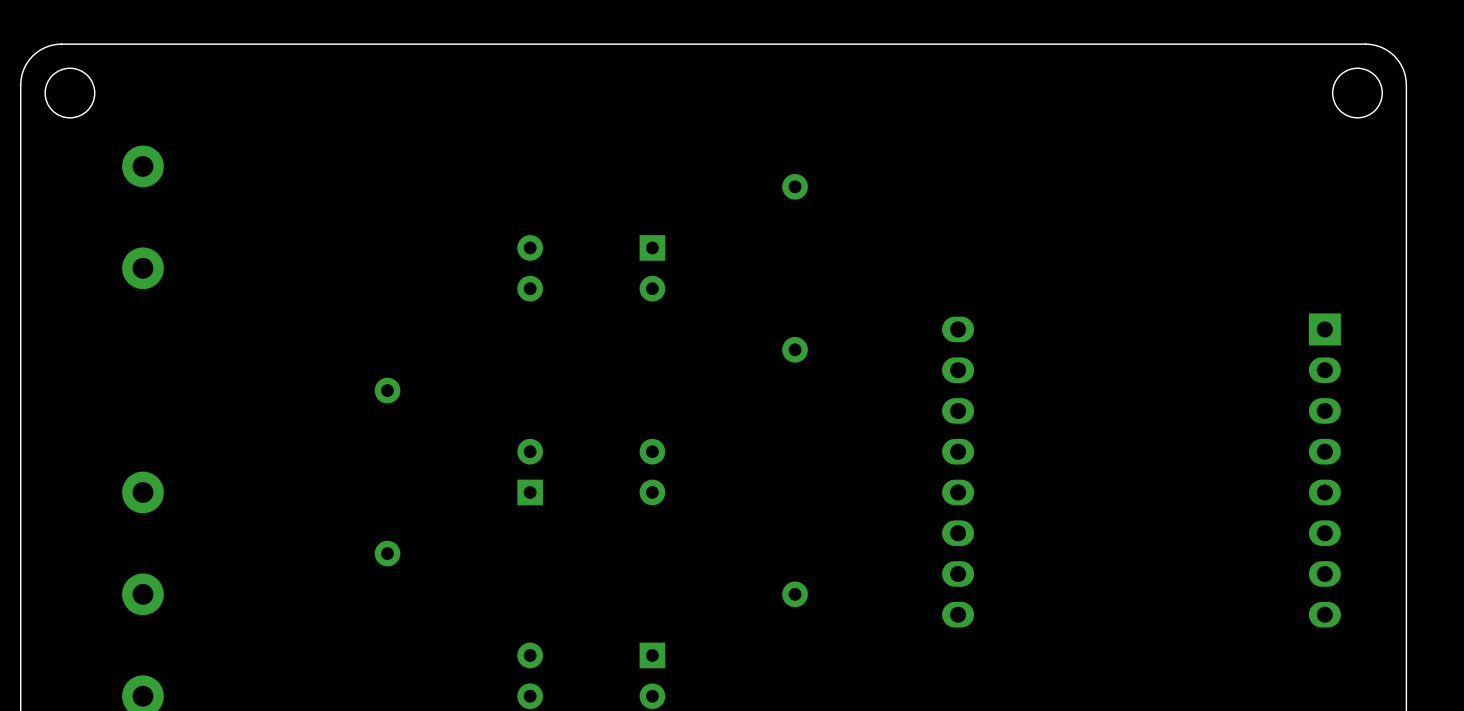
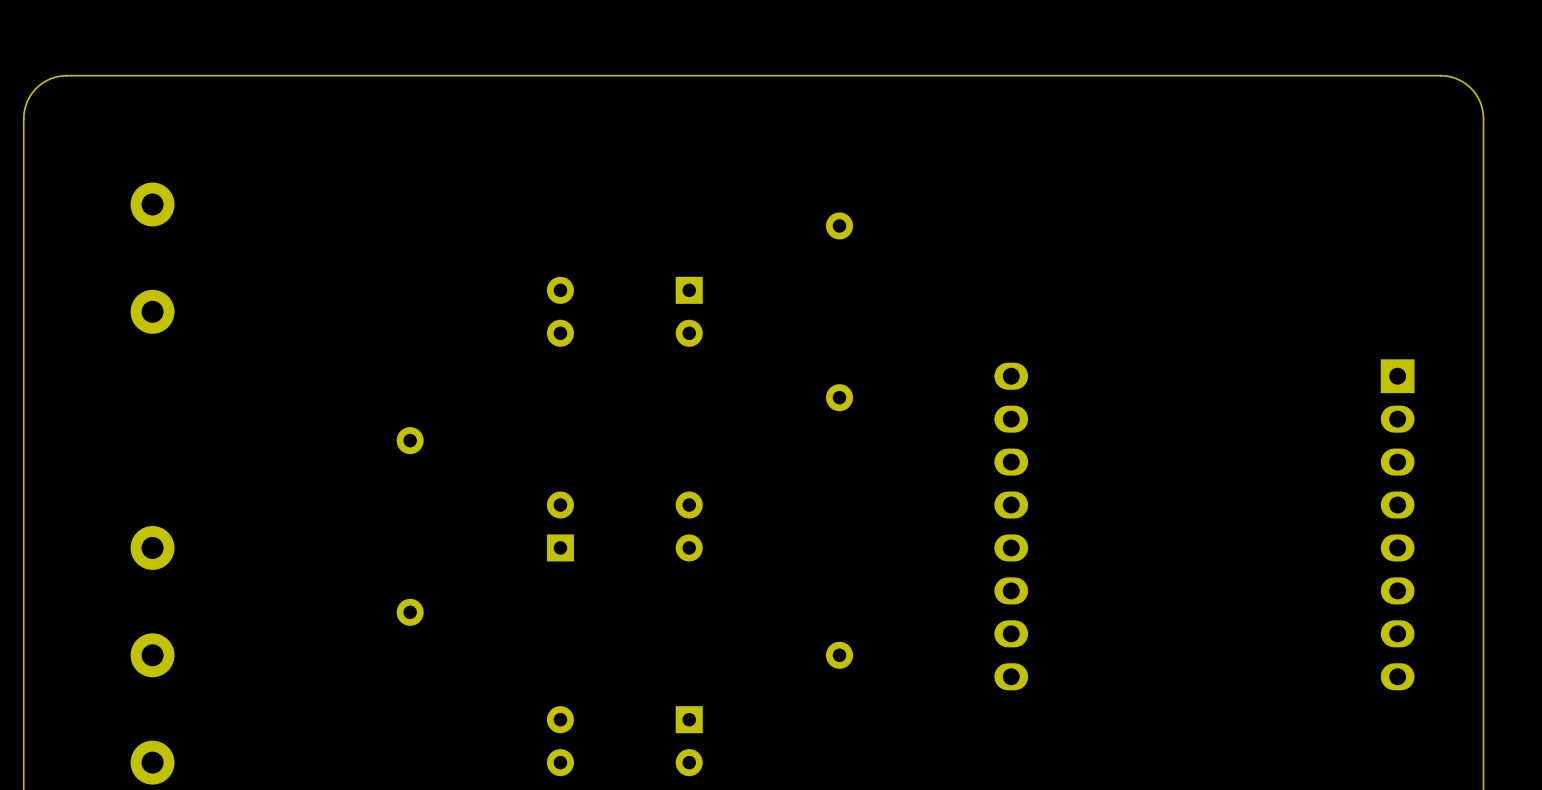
round board edge: [44, 67, 96, 119] -> none
round board edge: [1332, 67, 1383, 119] -> none

